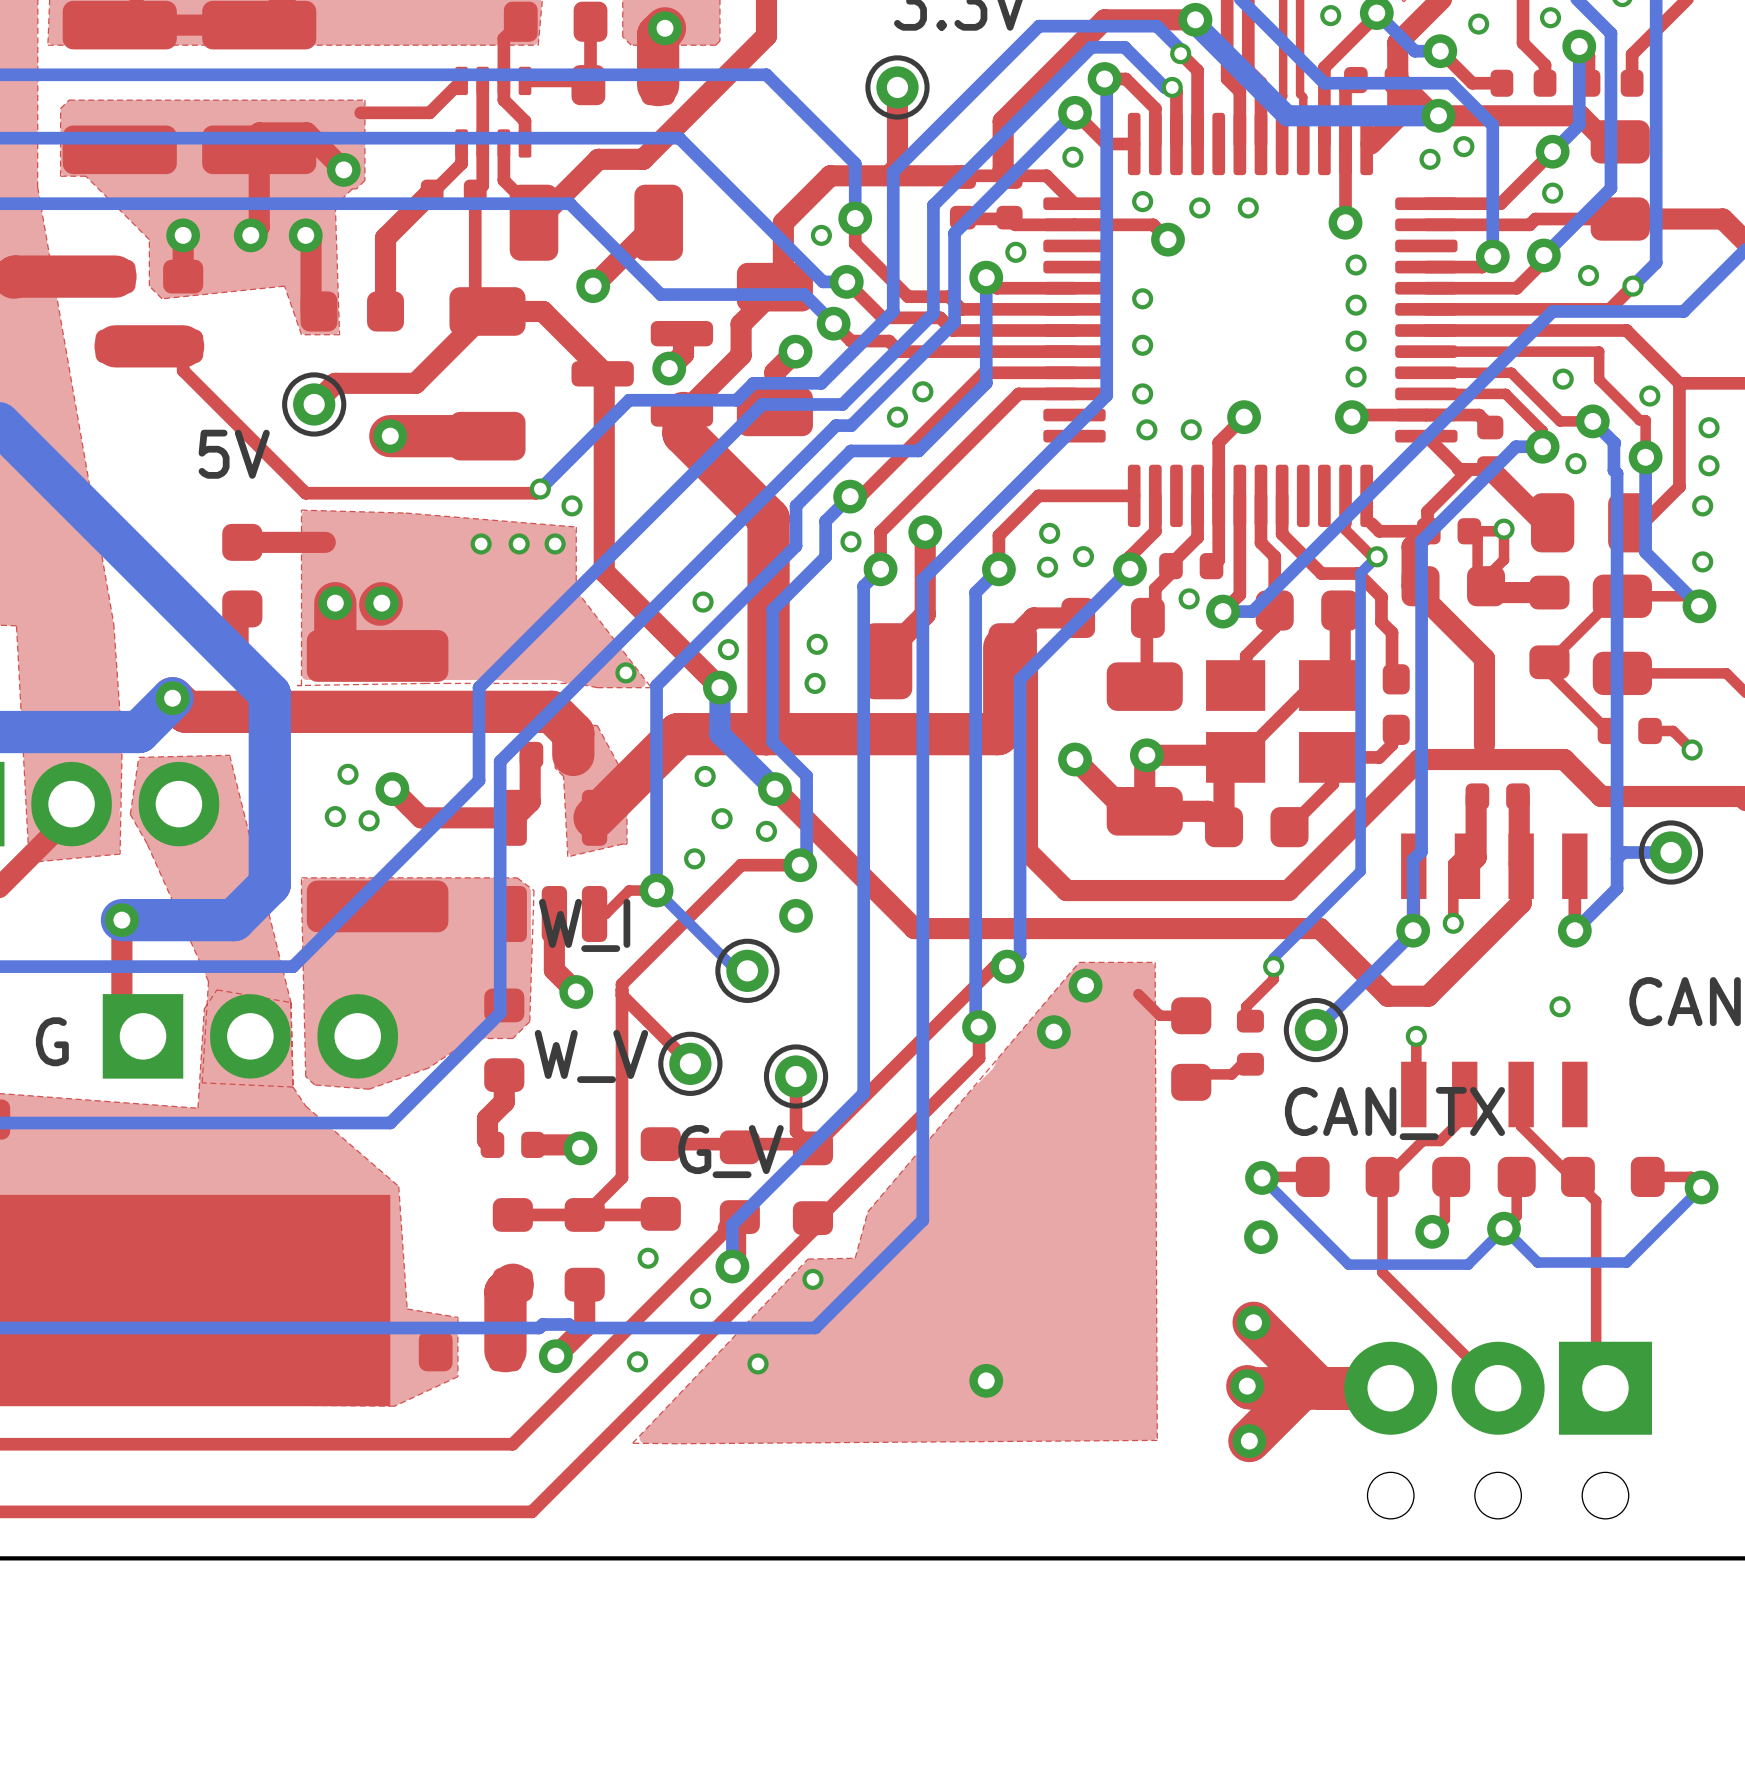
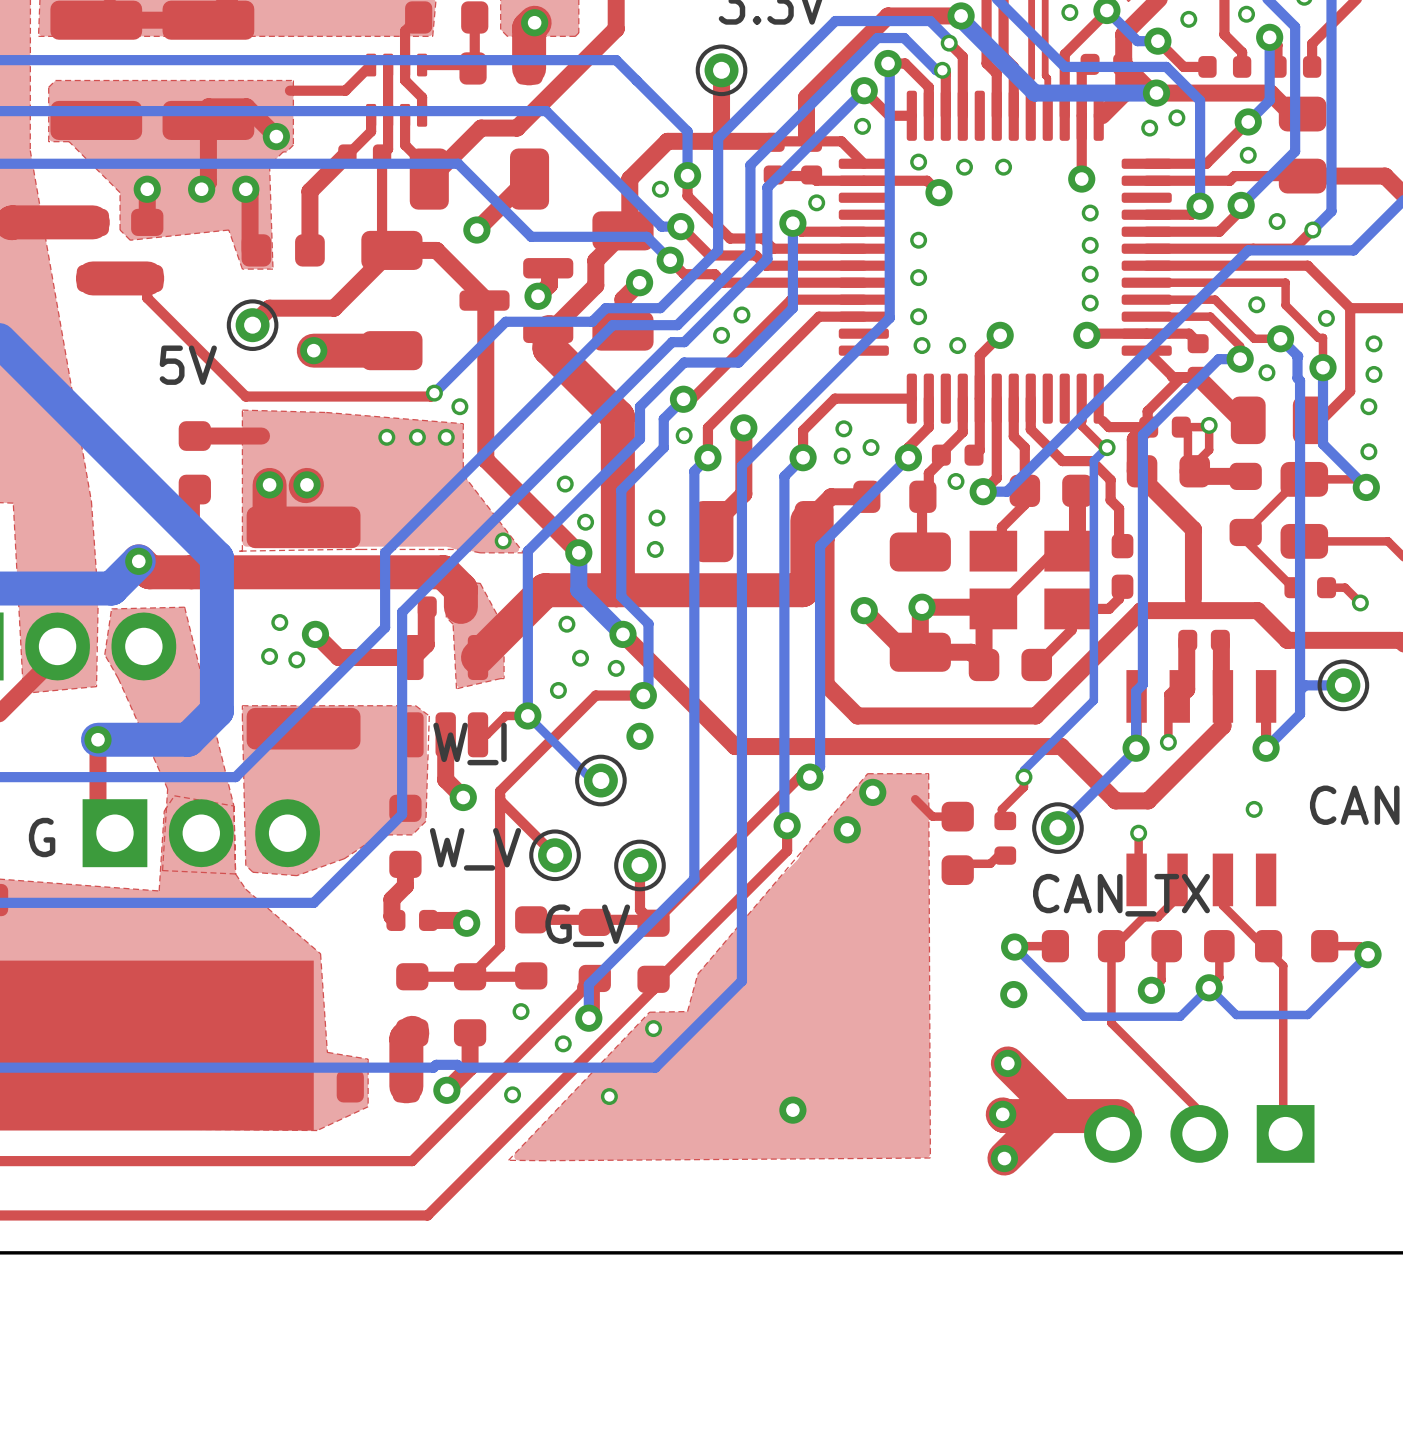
part footprint: [1344, 1341, 1652, 1519] -> [1084, 1105, 1315, 1163]

